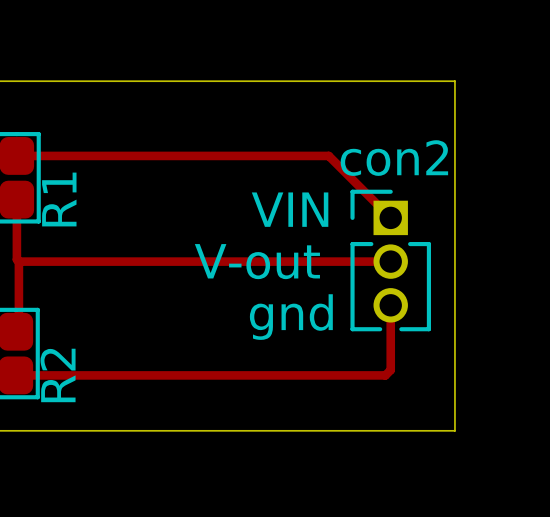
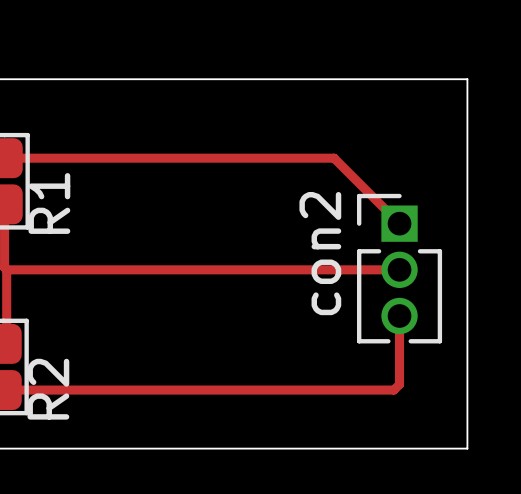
con2 name rotation: 0° (394, 158) -> 90° counterclockwise (320, 253)
text: VIN (290, 209) -> none
text: V-out (257, 261) -> none
text: gnd (291, 317) -> none

